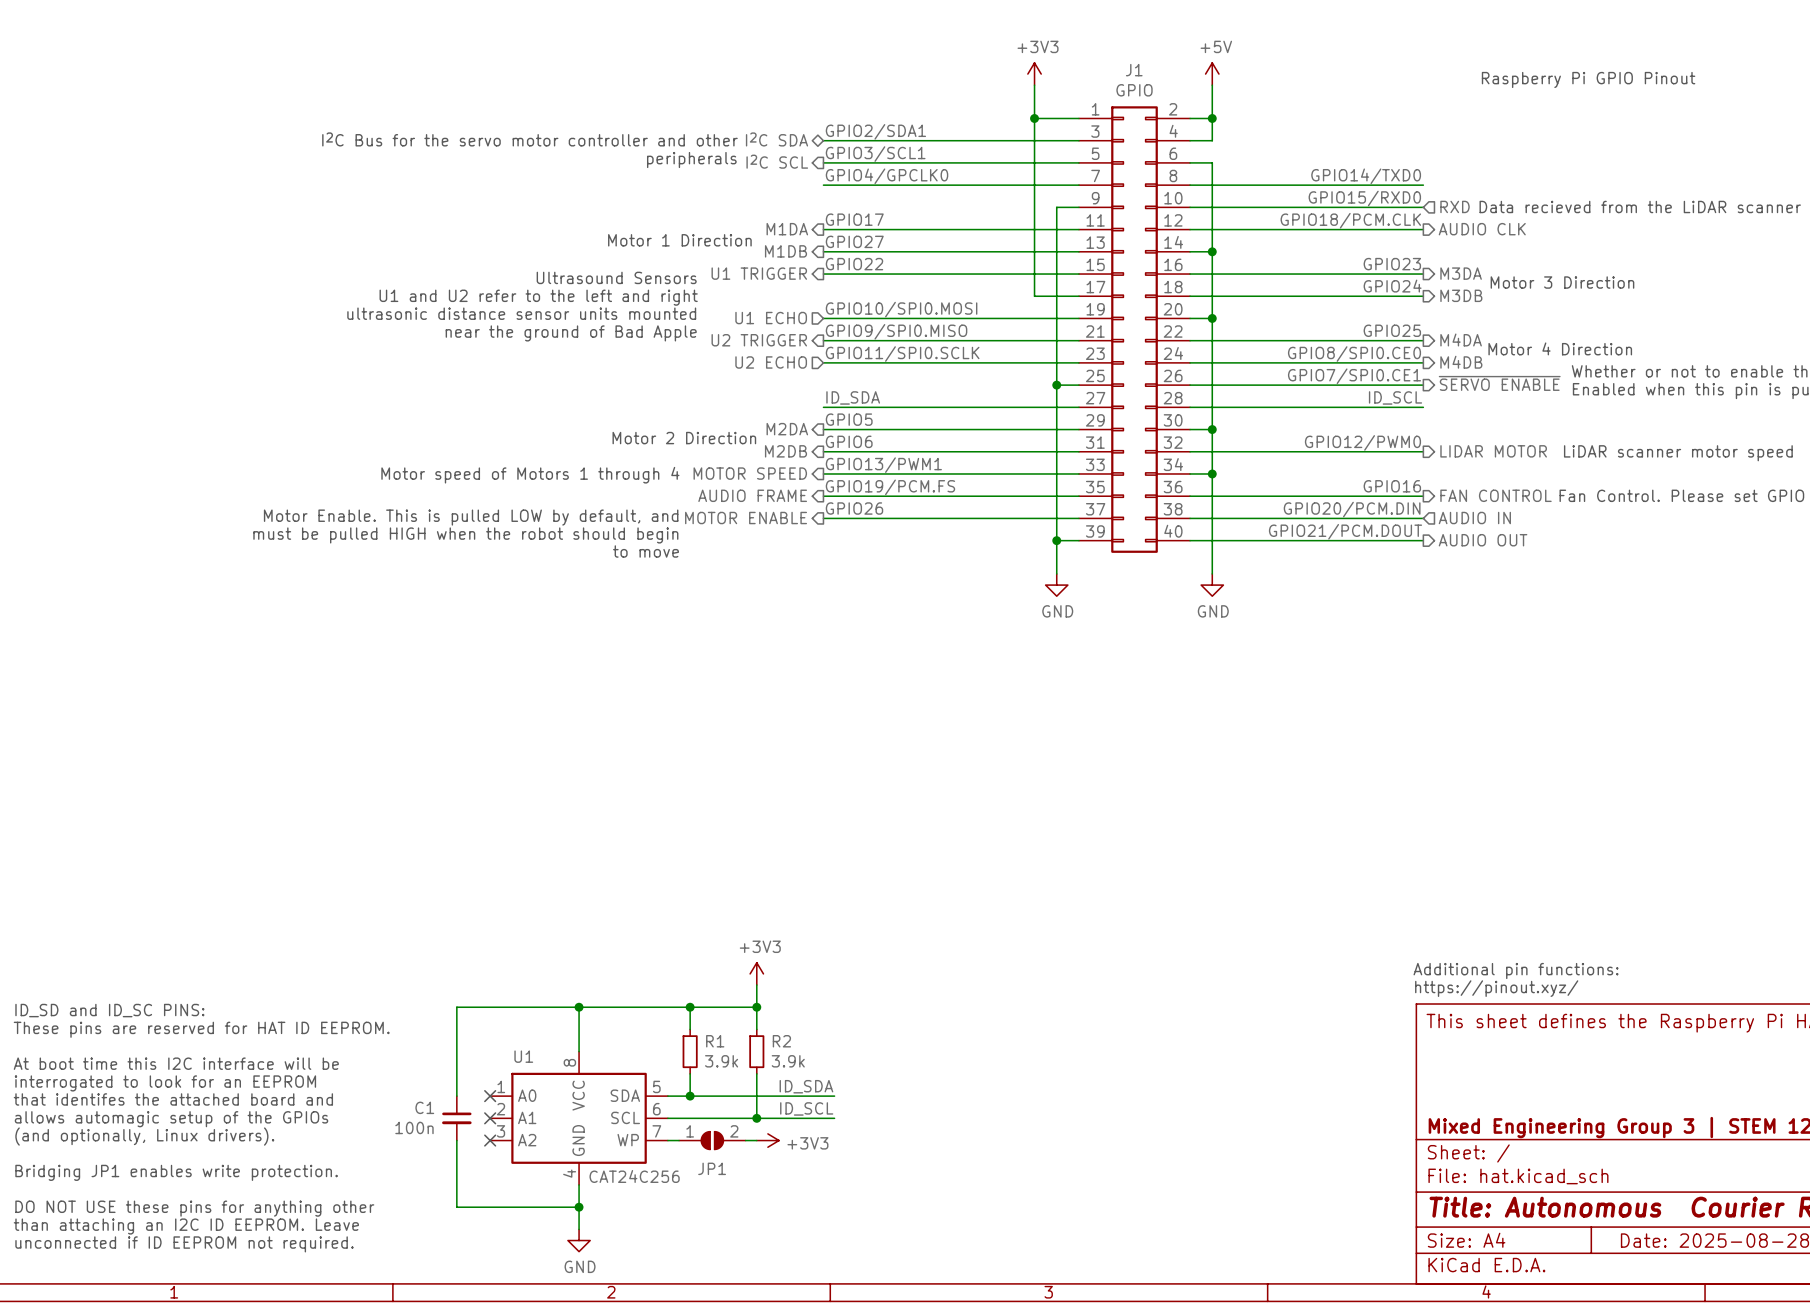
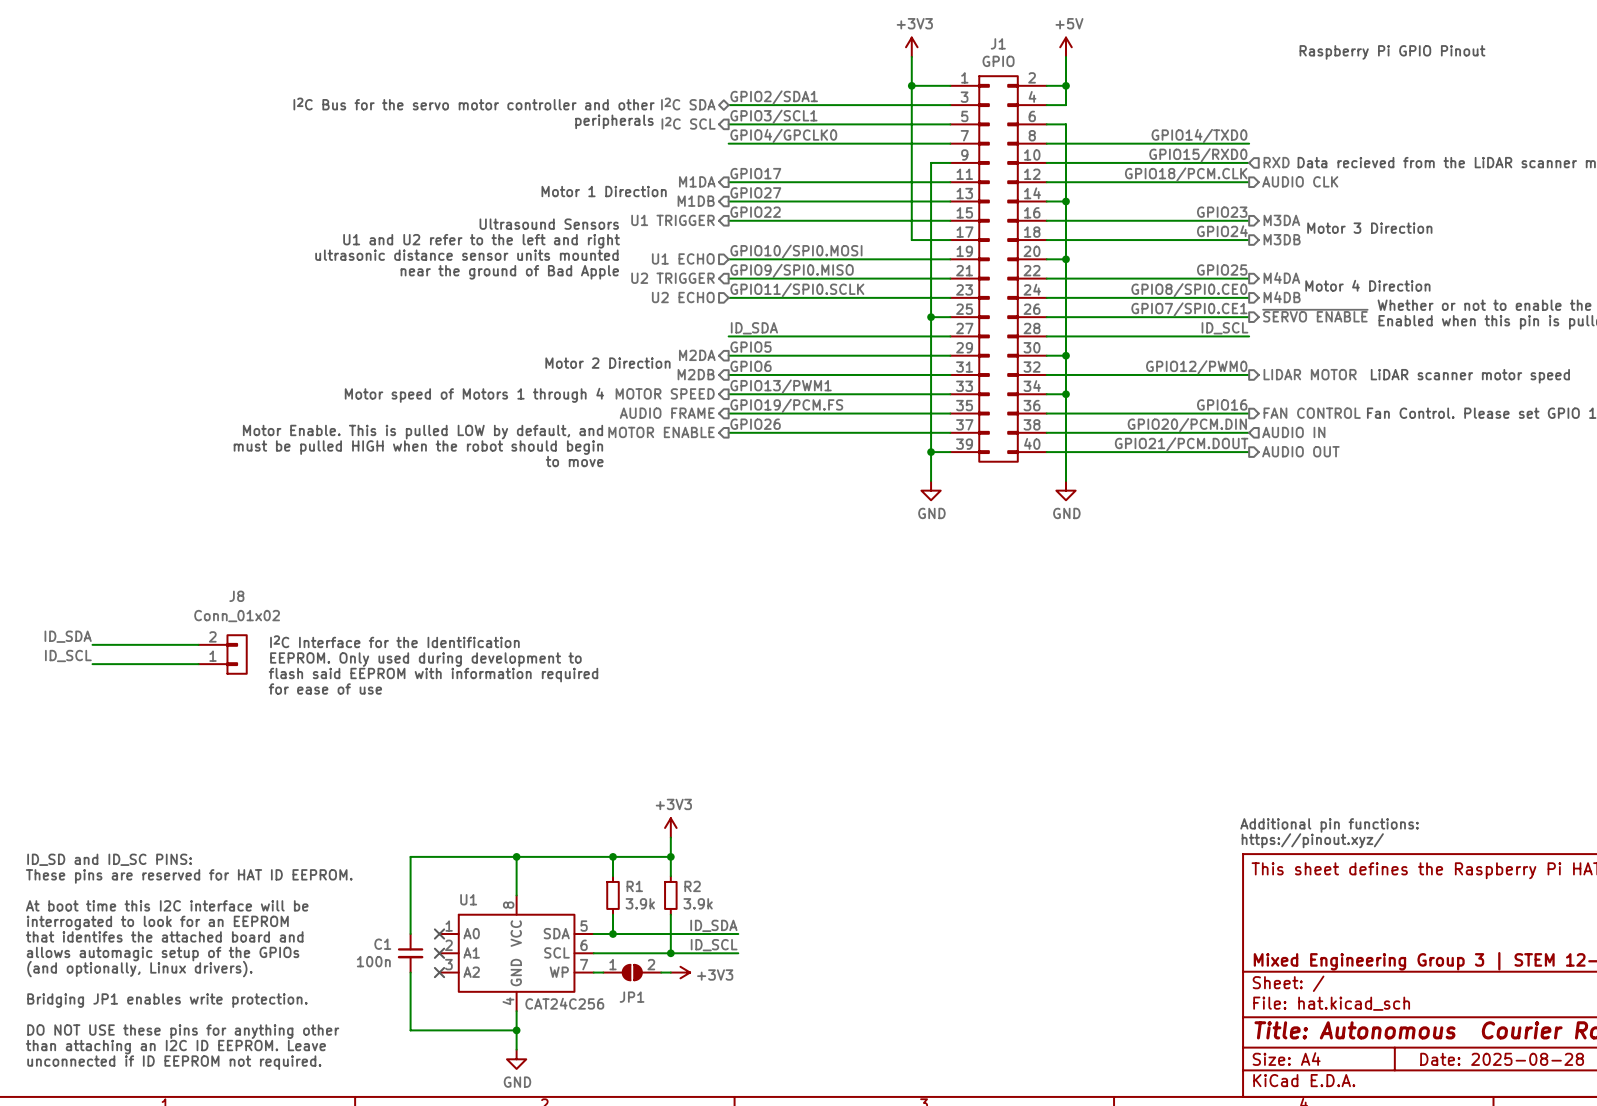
label: none -> ID_SDA (68, 636)
text: none -> I2C Interface for the Identification (394, 641)
wire: none -> (92, 644) (198, 644)
J8: none -> Conn_01x02 (223, 654)
label: none -> ID_SCL (68, 655)
text: none -> EEPROM. Only used during development to (425, 659)
wire: none -> (92, 664) (198, 664)
text: none -> flash said EEPROM with information required (433, 675)
text: none -> for ease of use (325, 689)

